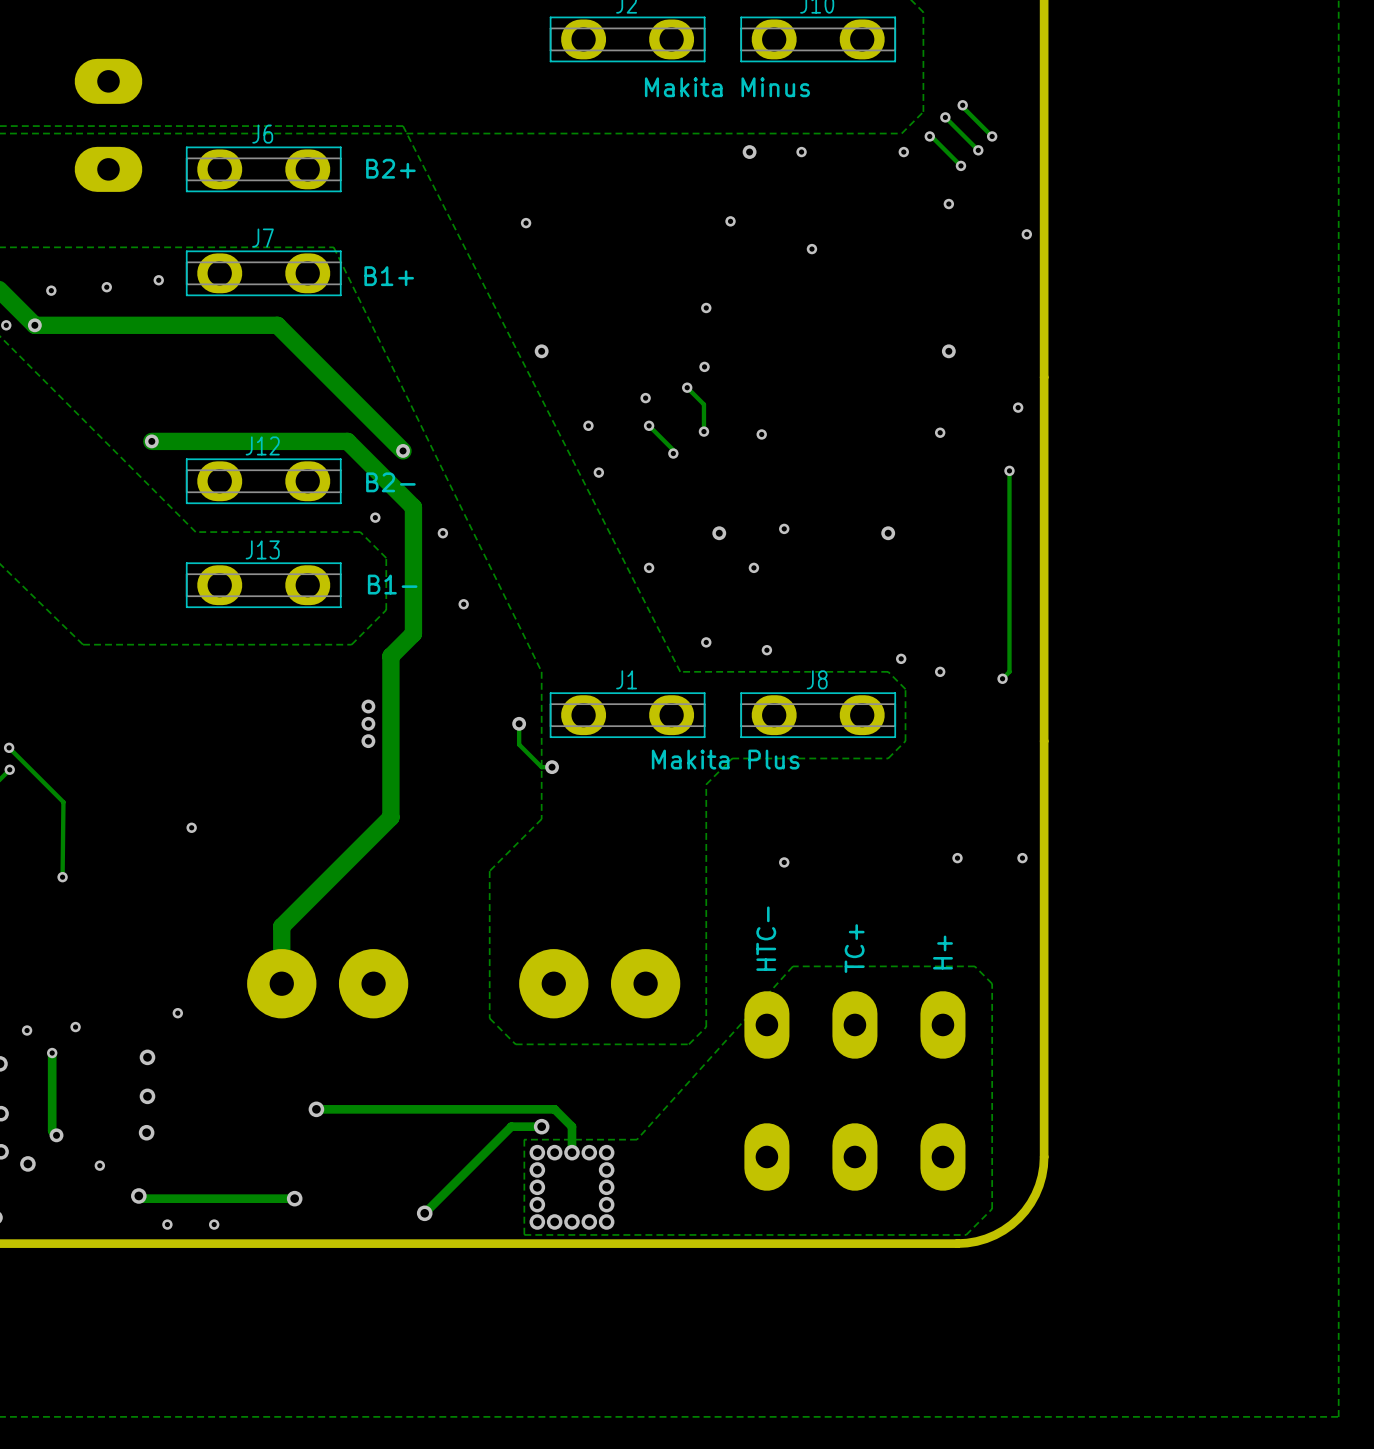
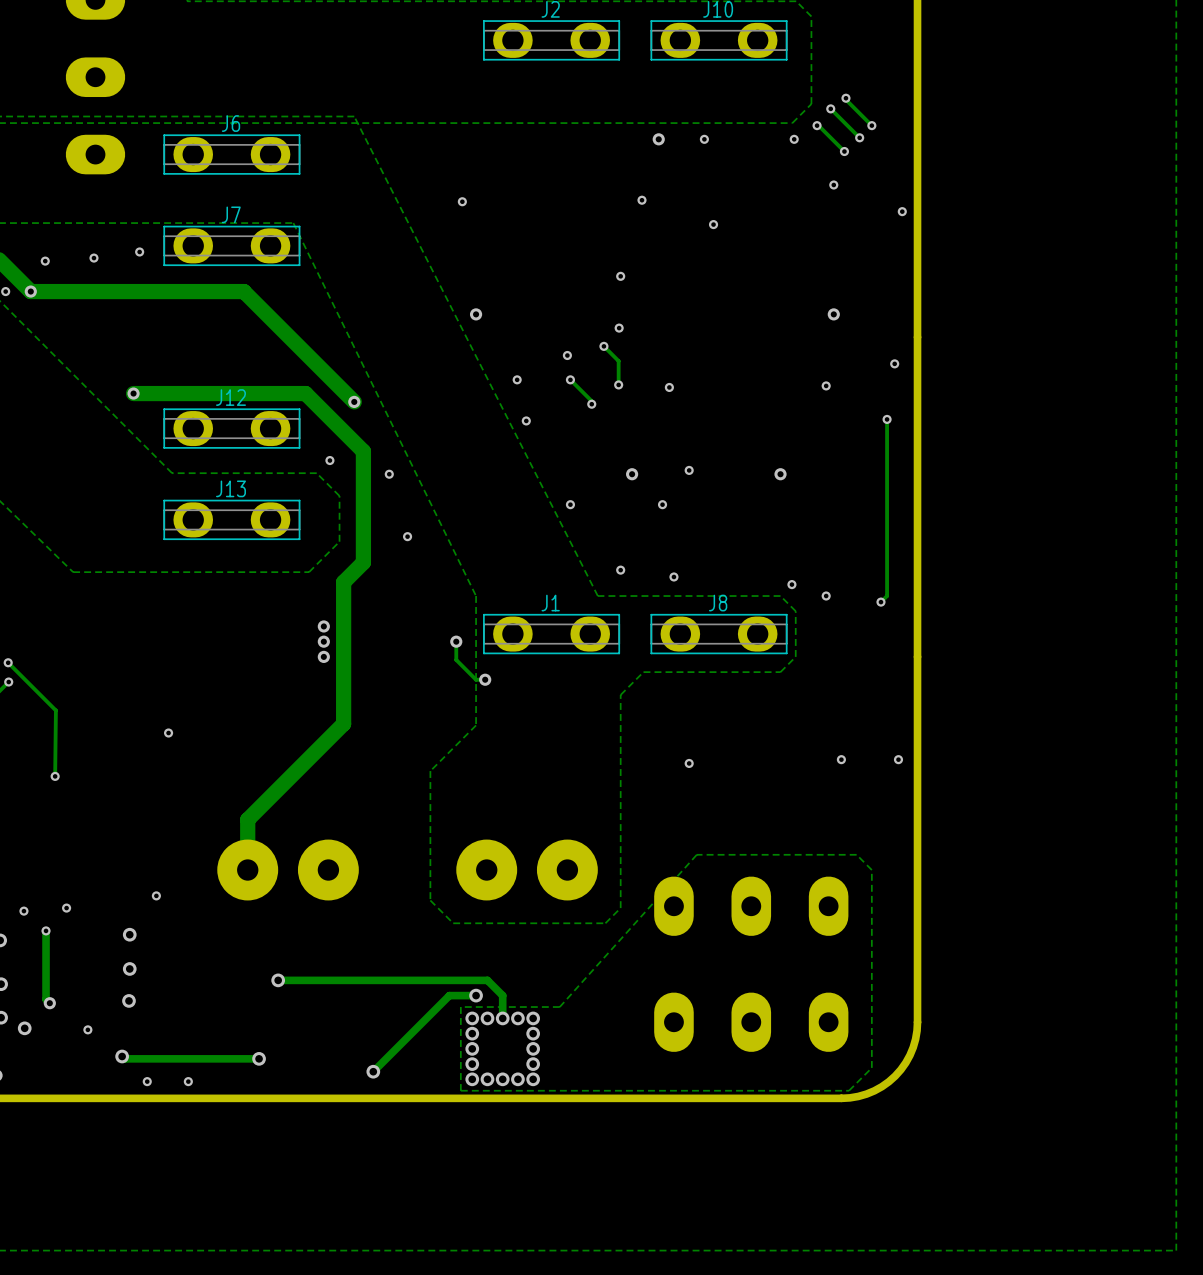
text: Makita Minus (727, 87) -> none
text: B2+ (390, 168) -> none
text: B1+ (389, 276) -> none
text: B2- (390, 482) -> none
text: B1- (392, 584) -> none
text: Makita Plus (725, 759) -> none
text: HTC- (766, 938) -> none
text: TC+ (854, 948) -> none
text: H+ (942, 952) -> none

